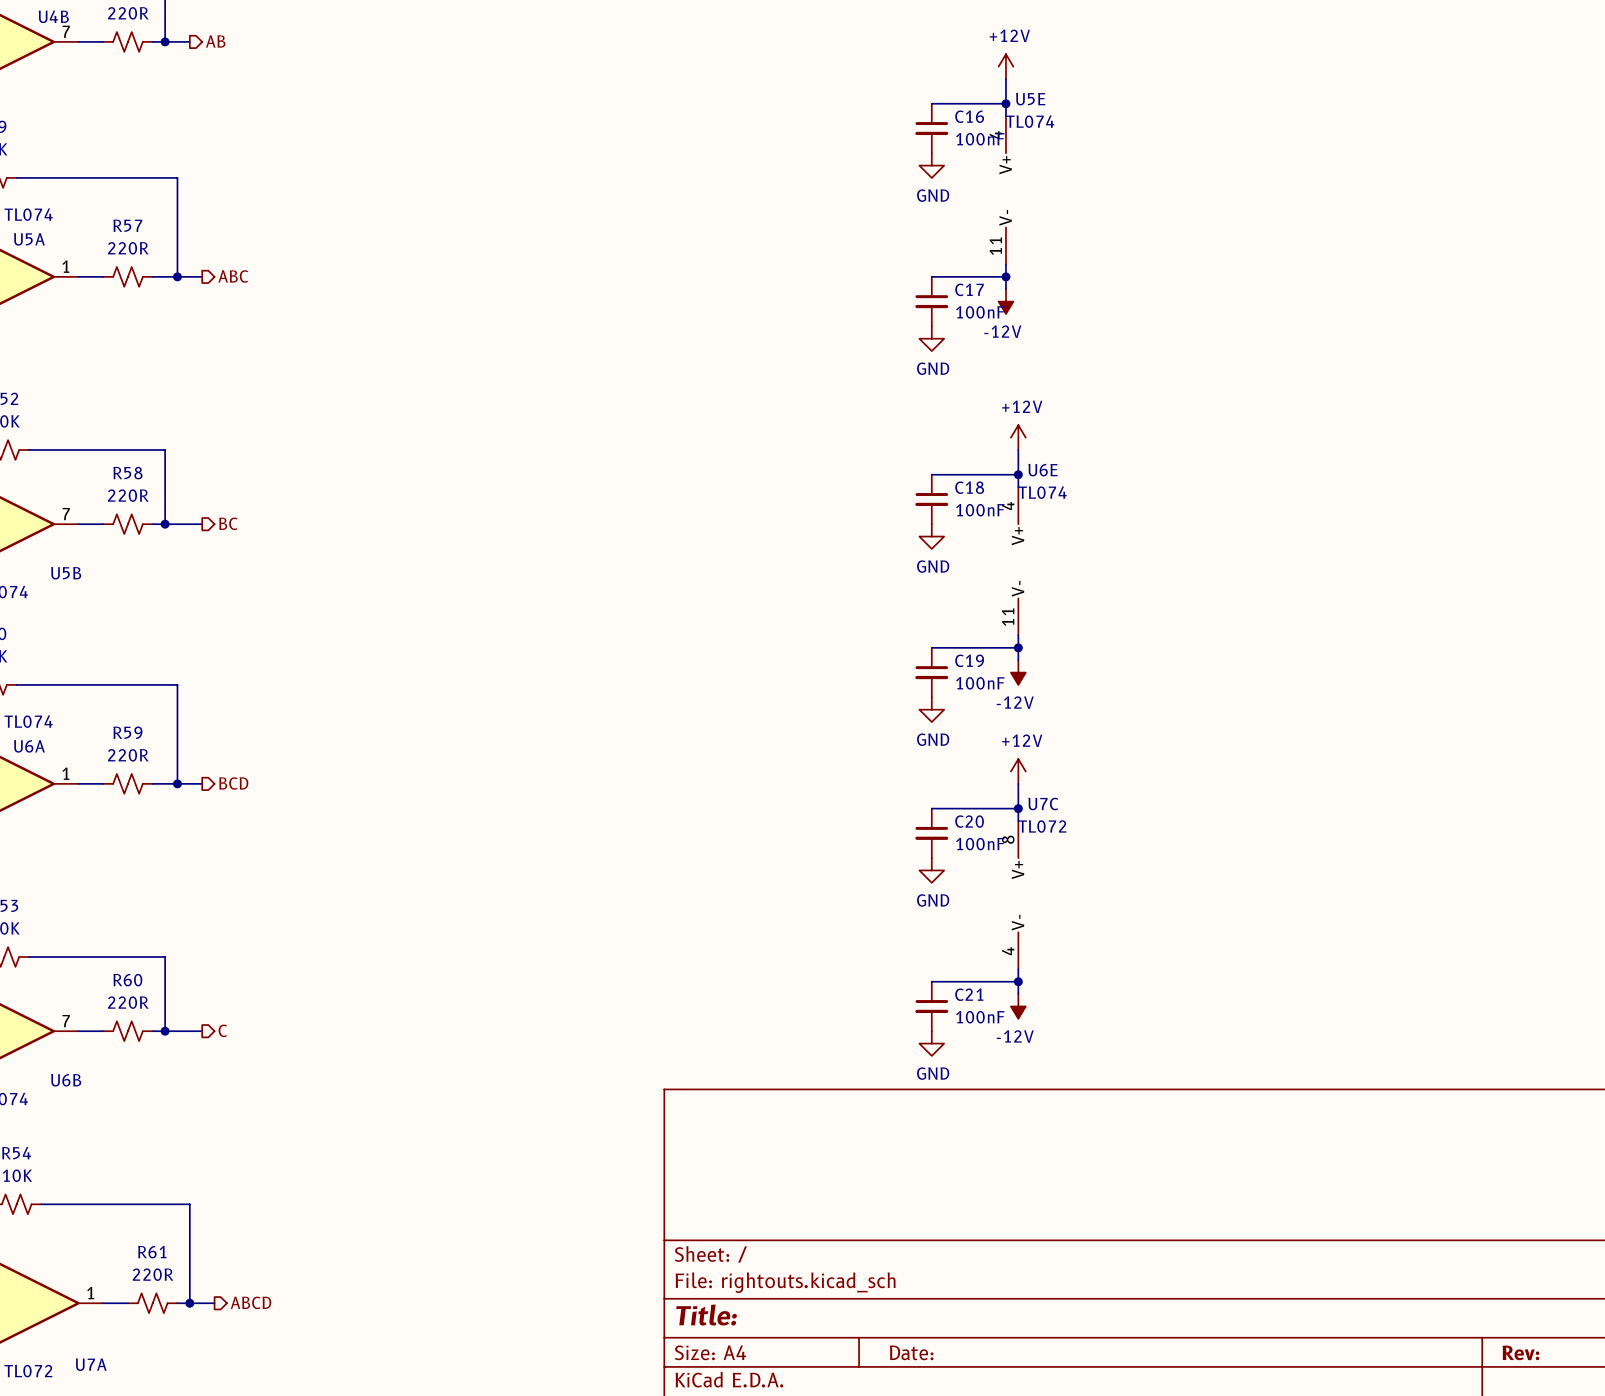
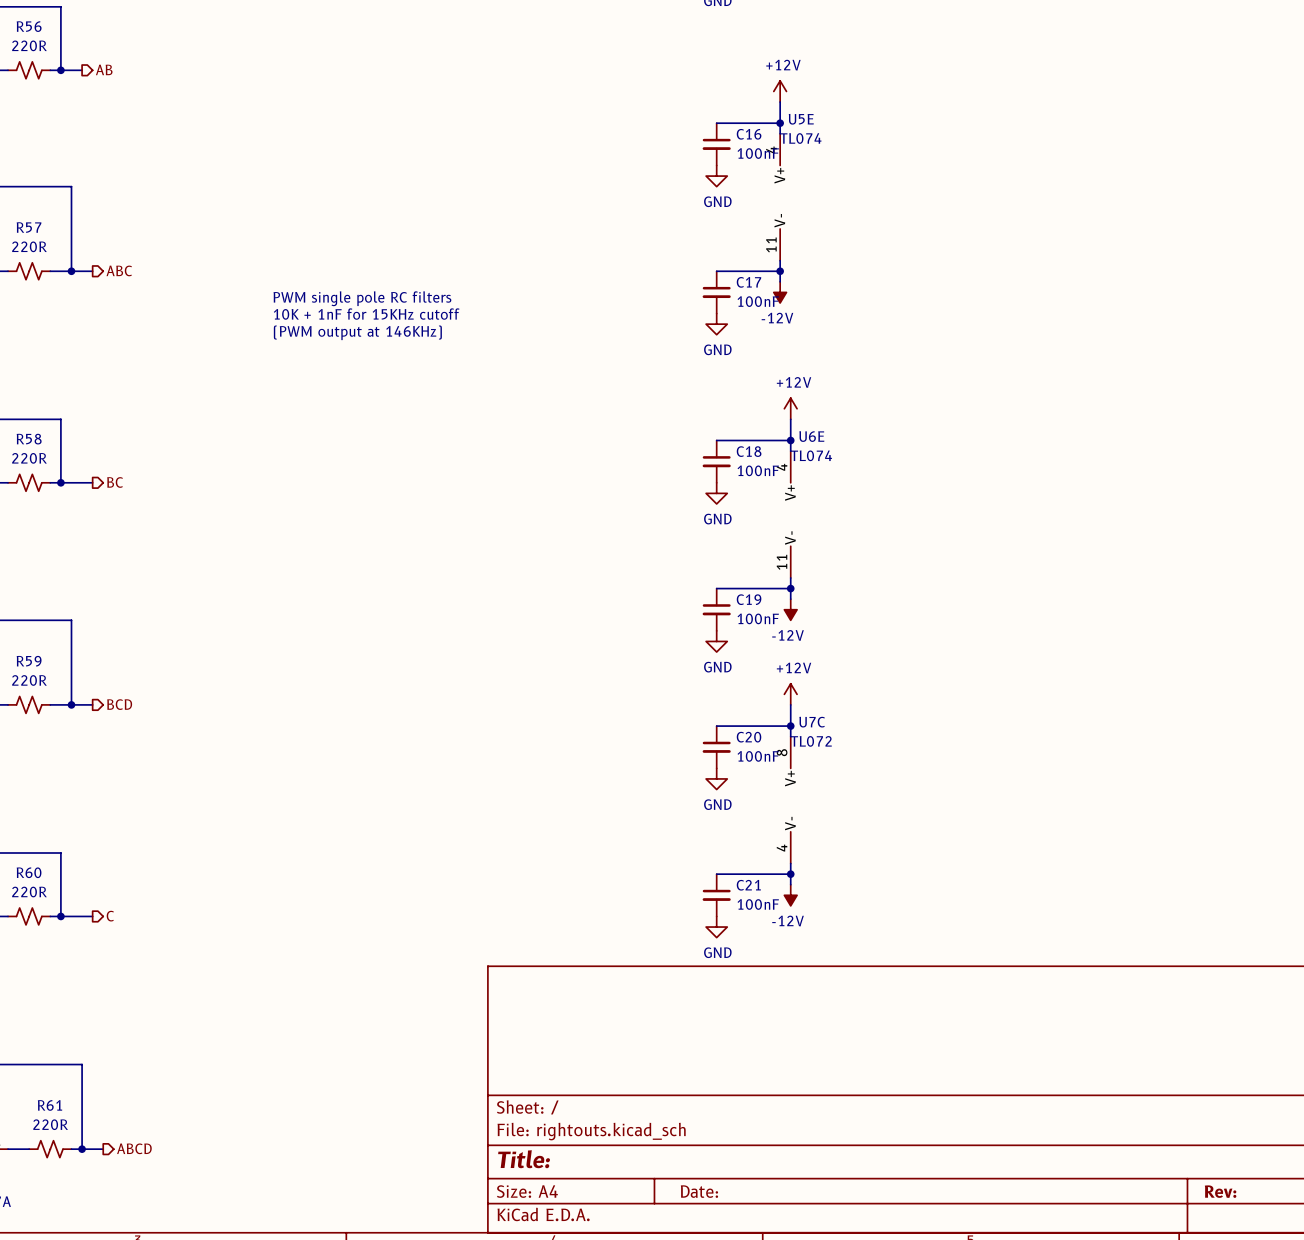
text: none -> PWM single pole RC filters (362, 298)
text: none -> 10K + 1nF for 15KHz cutoff (366, 314)
text: none -> (PWM output at 146KHz) (357, 332)

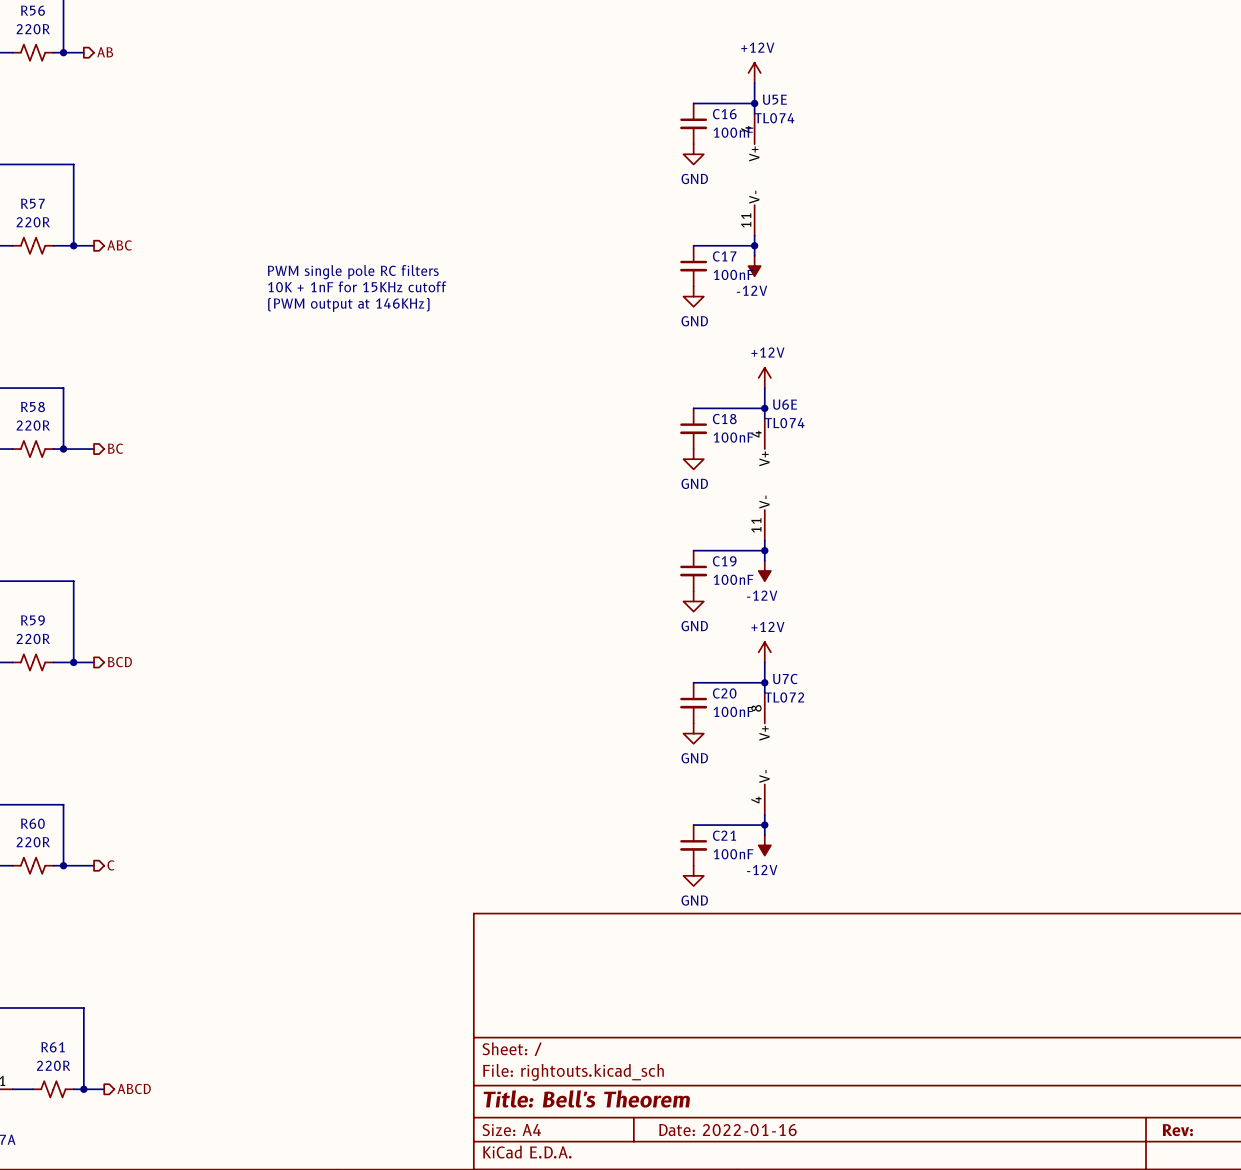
title block: Title: (524, 1159) -> Title: Bell's Theorem (586, 1098)
title block: Date: (699, 1191) -> Date: 2022-01-16 (727, 1130)

